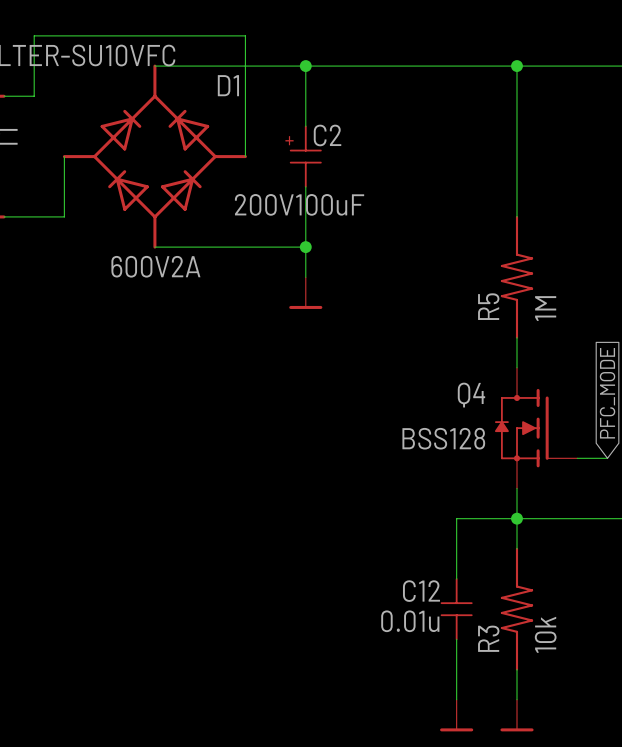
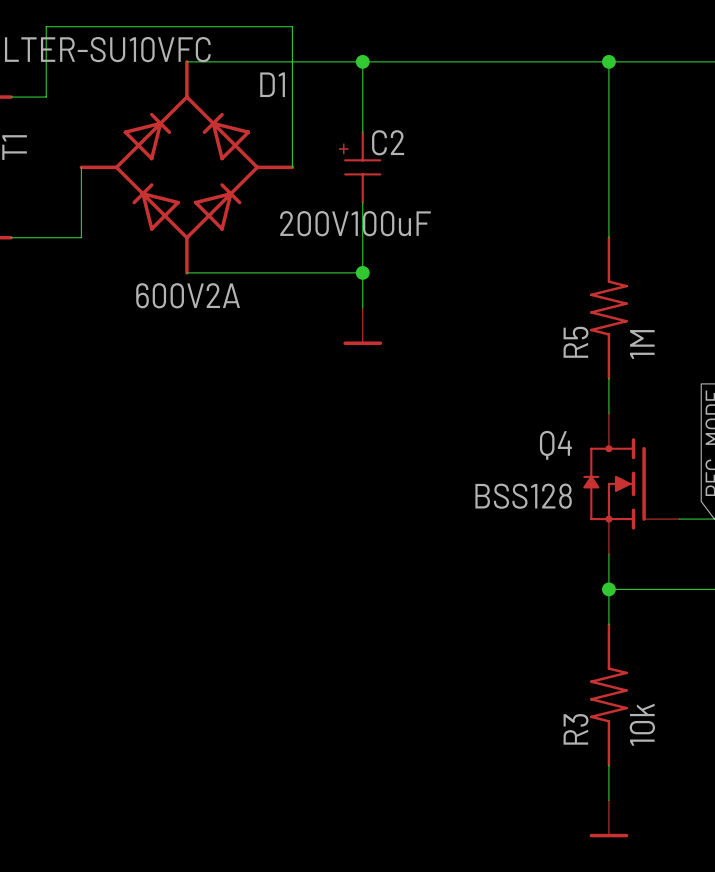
wire: (516, 518) (456, 518) (456, 579) -> none
C12: 0.01u (456, 609) -> none
wire: (456, 639) (456, 699) -> none
power symbol: (456, 715) -> none

